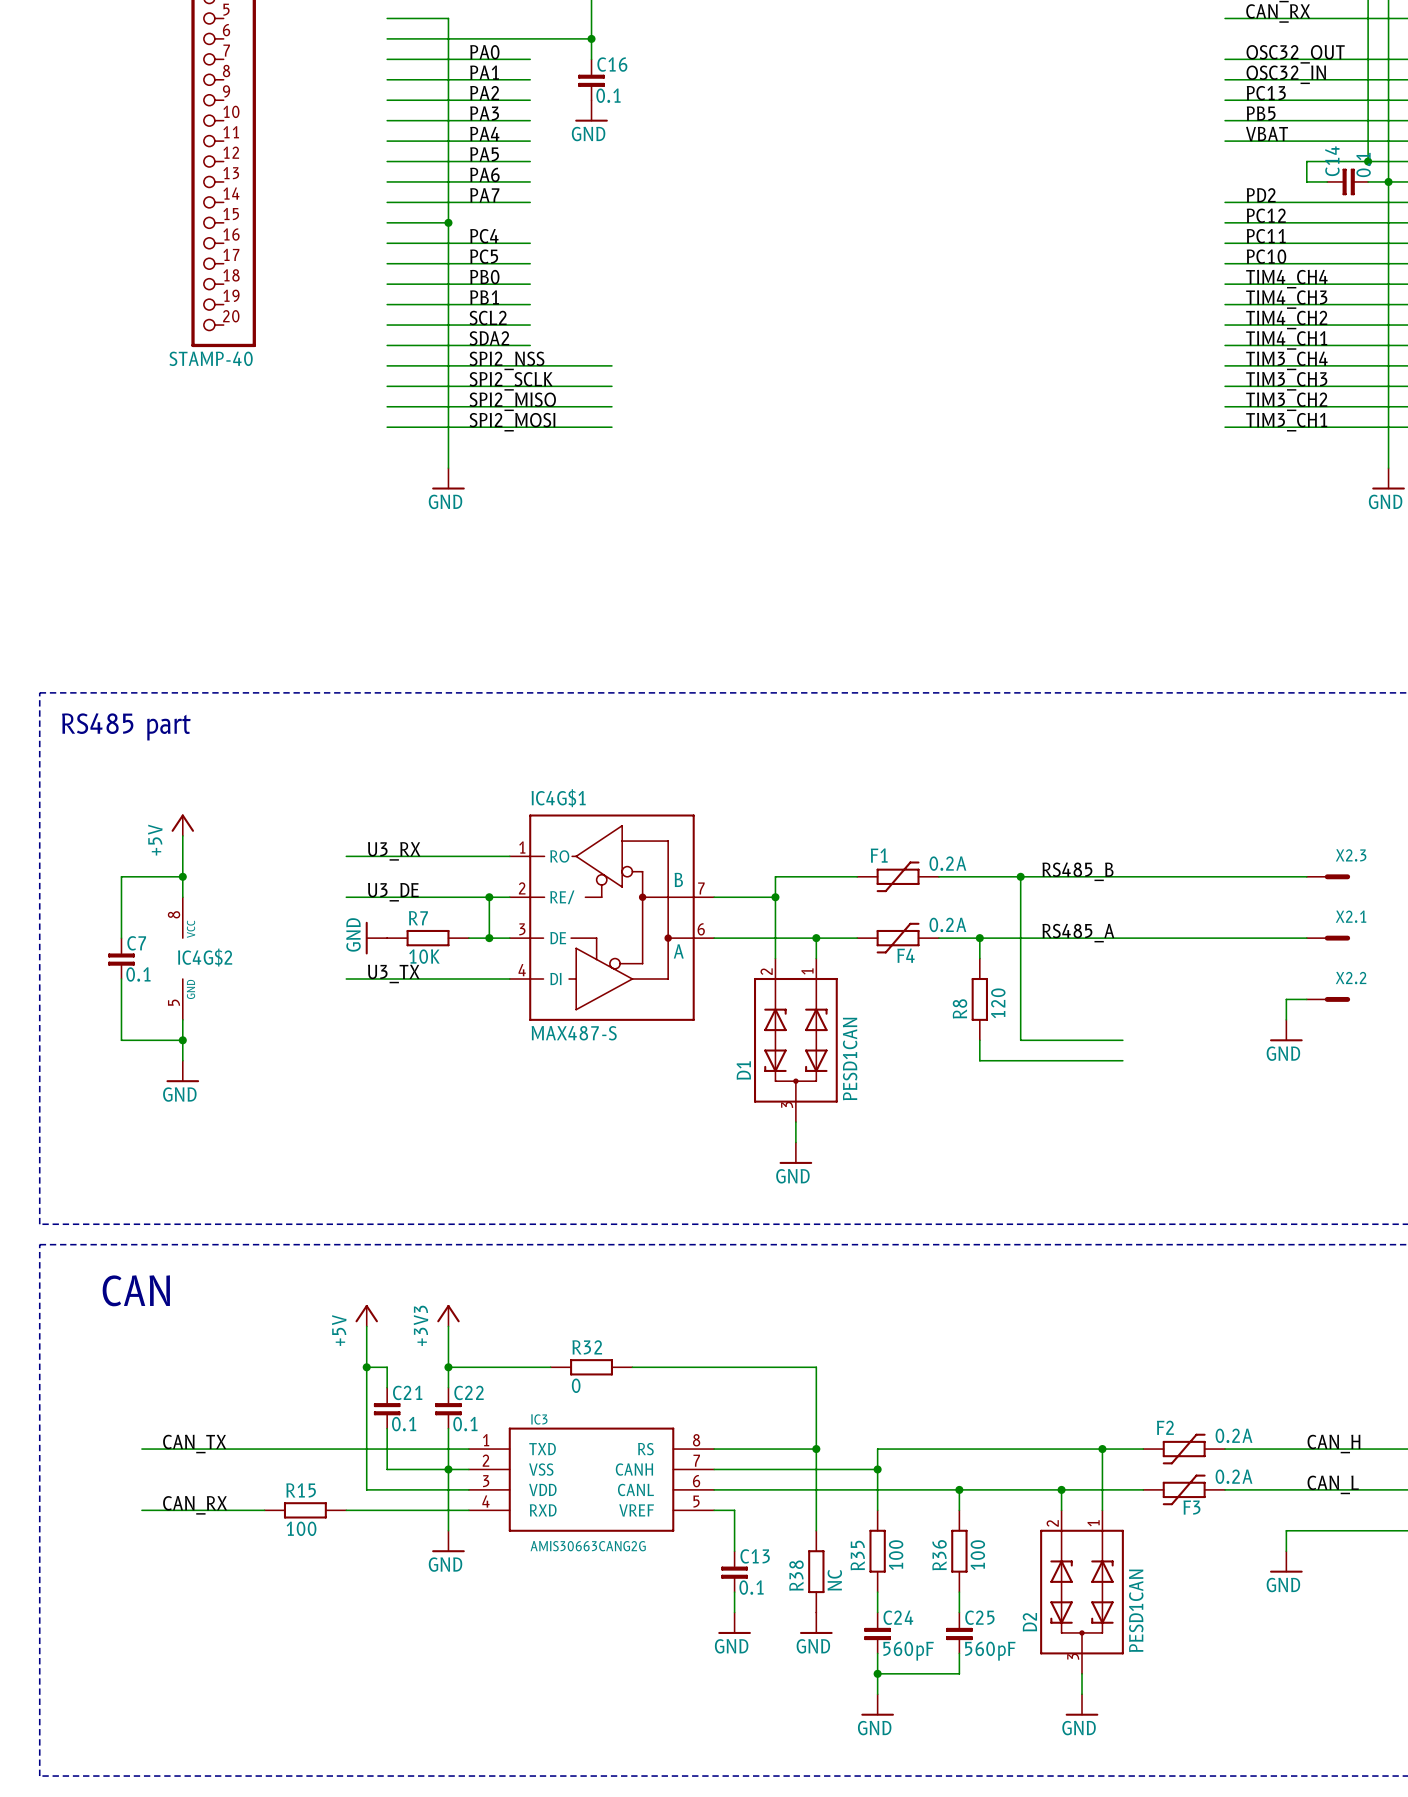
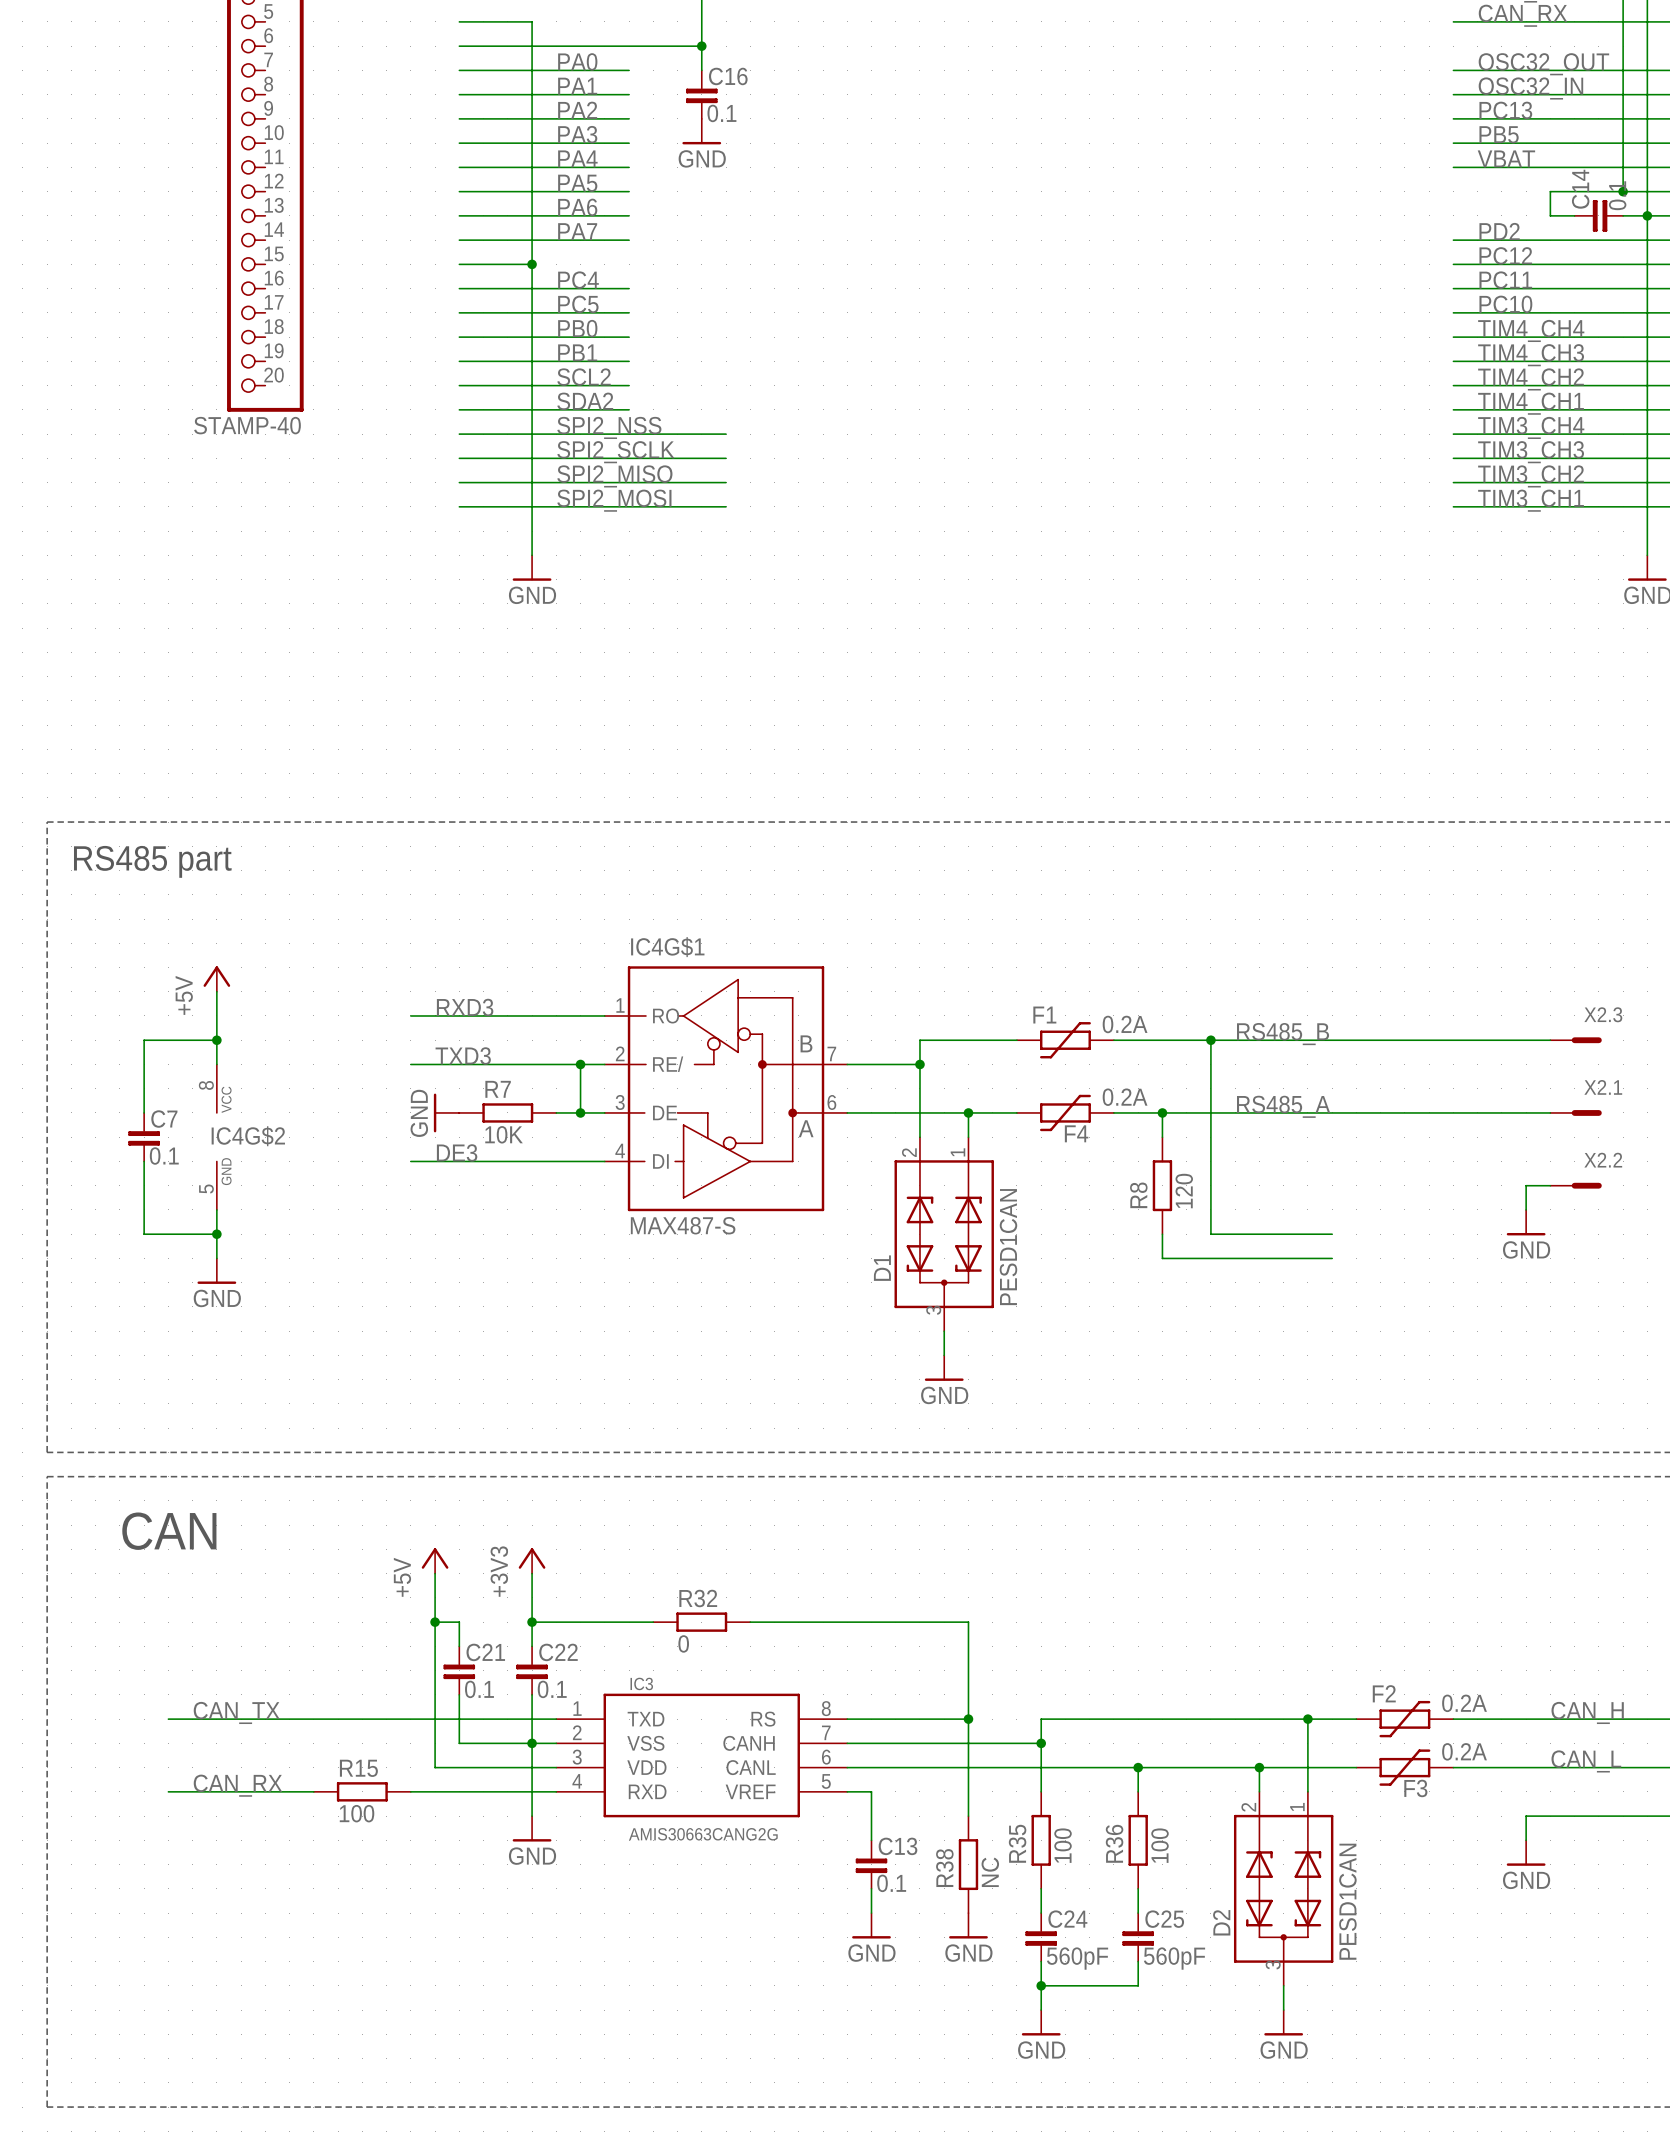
label: U3_RX (394, 851) -> RXD3 (465, 1007)
label: U3_DE (393, 892) -> TXD3 (463, 1055)
label: U3_TX (393, 973) -> DE3 (457, 1152)

